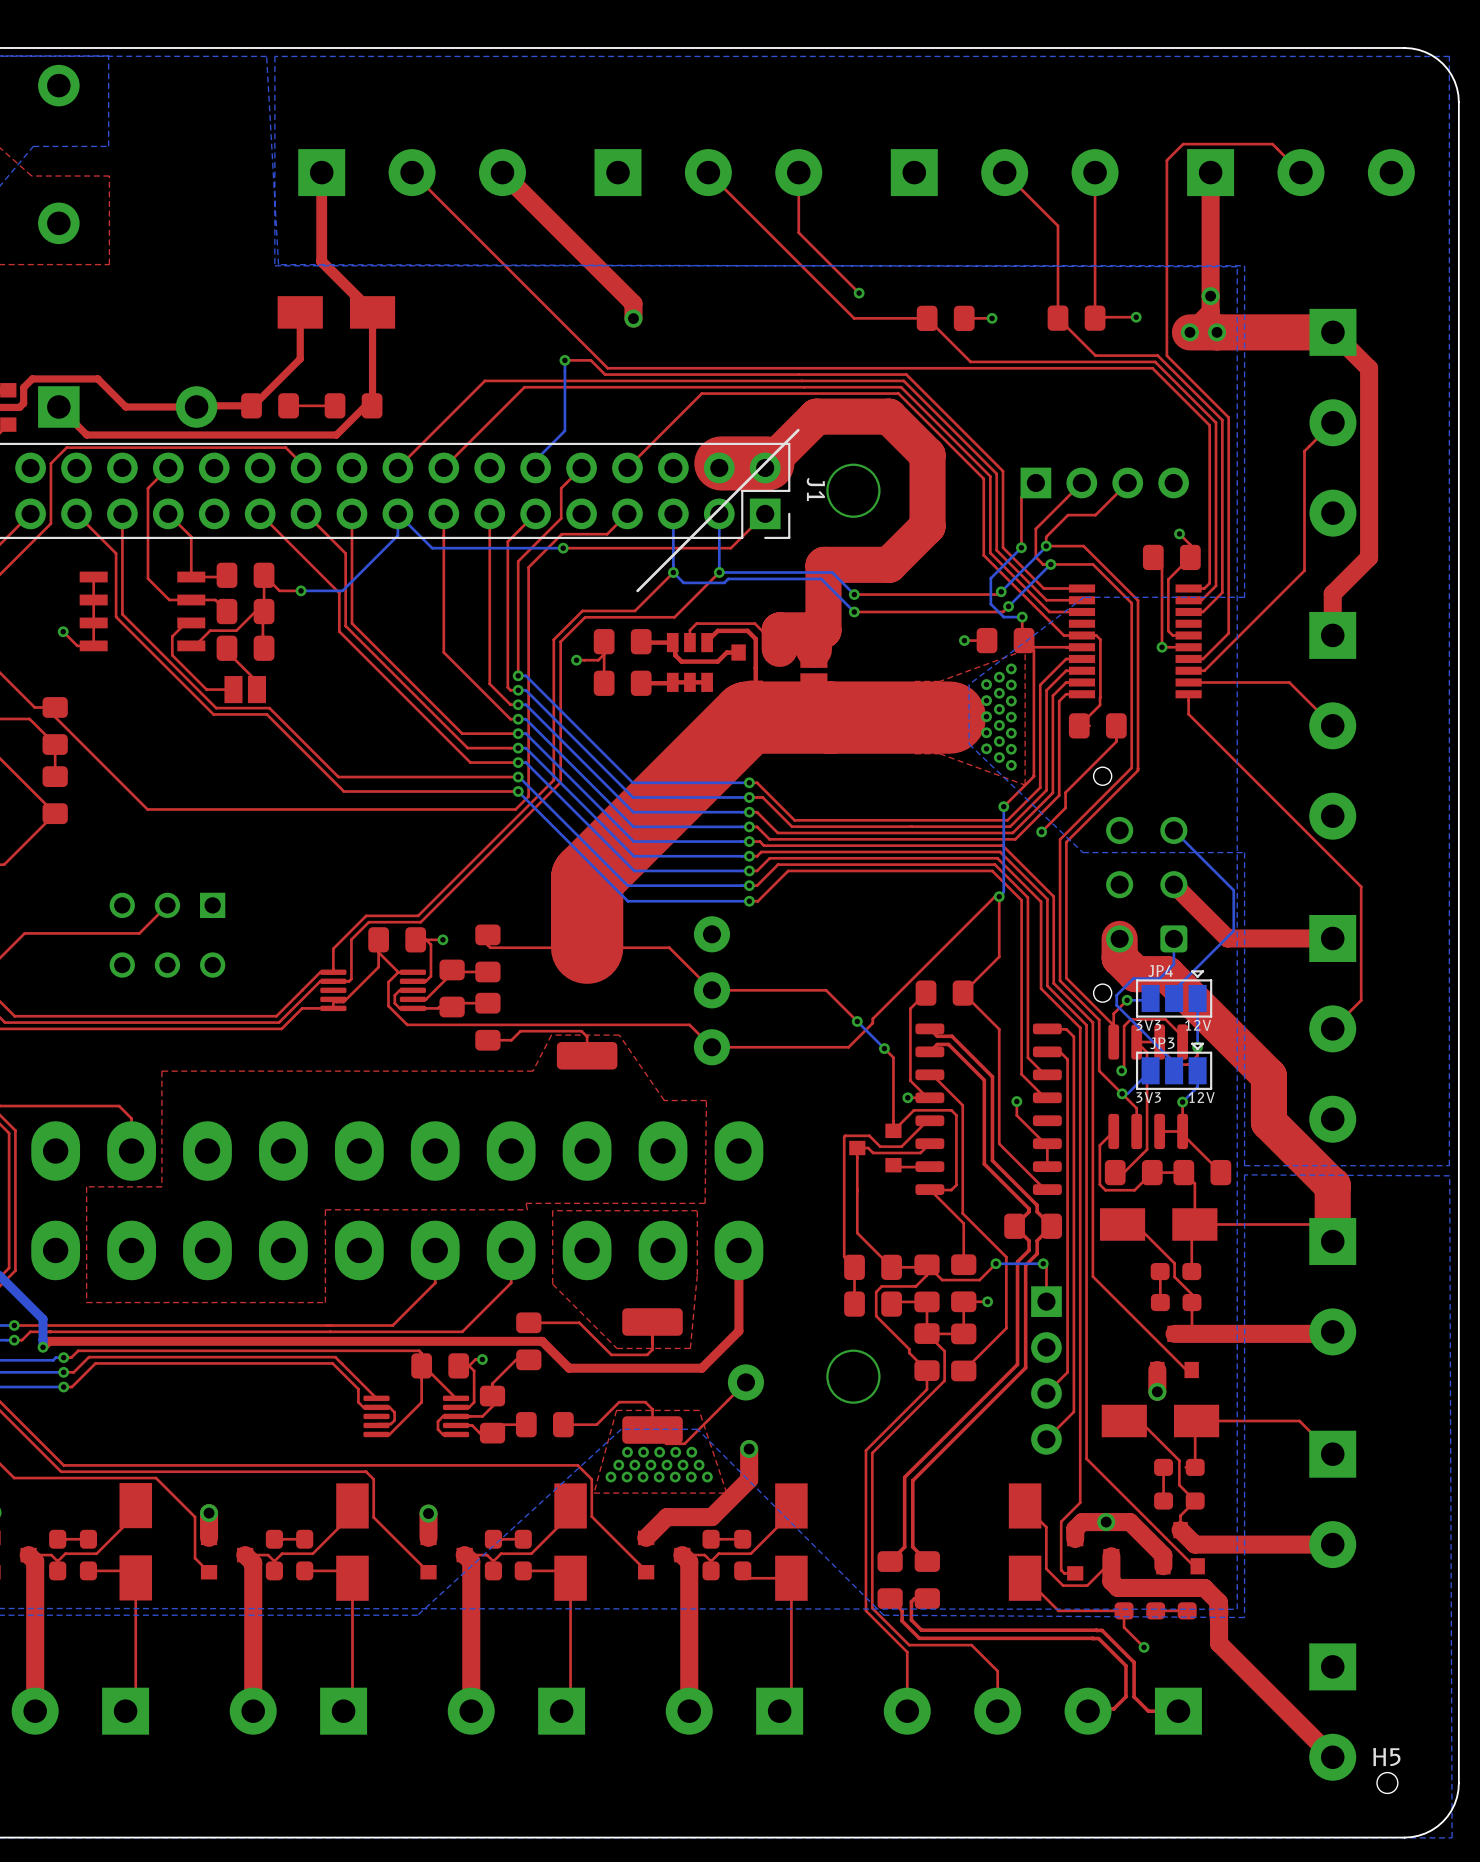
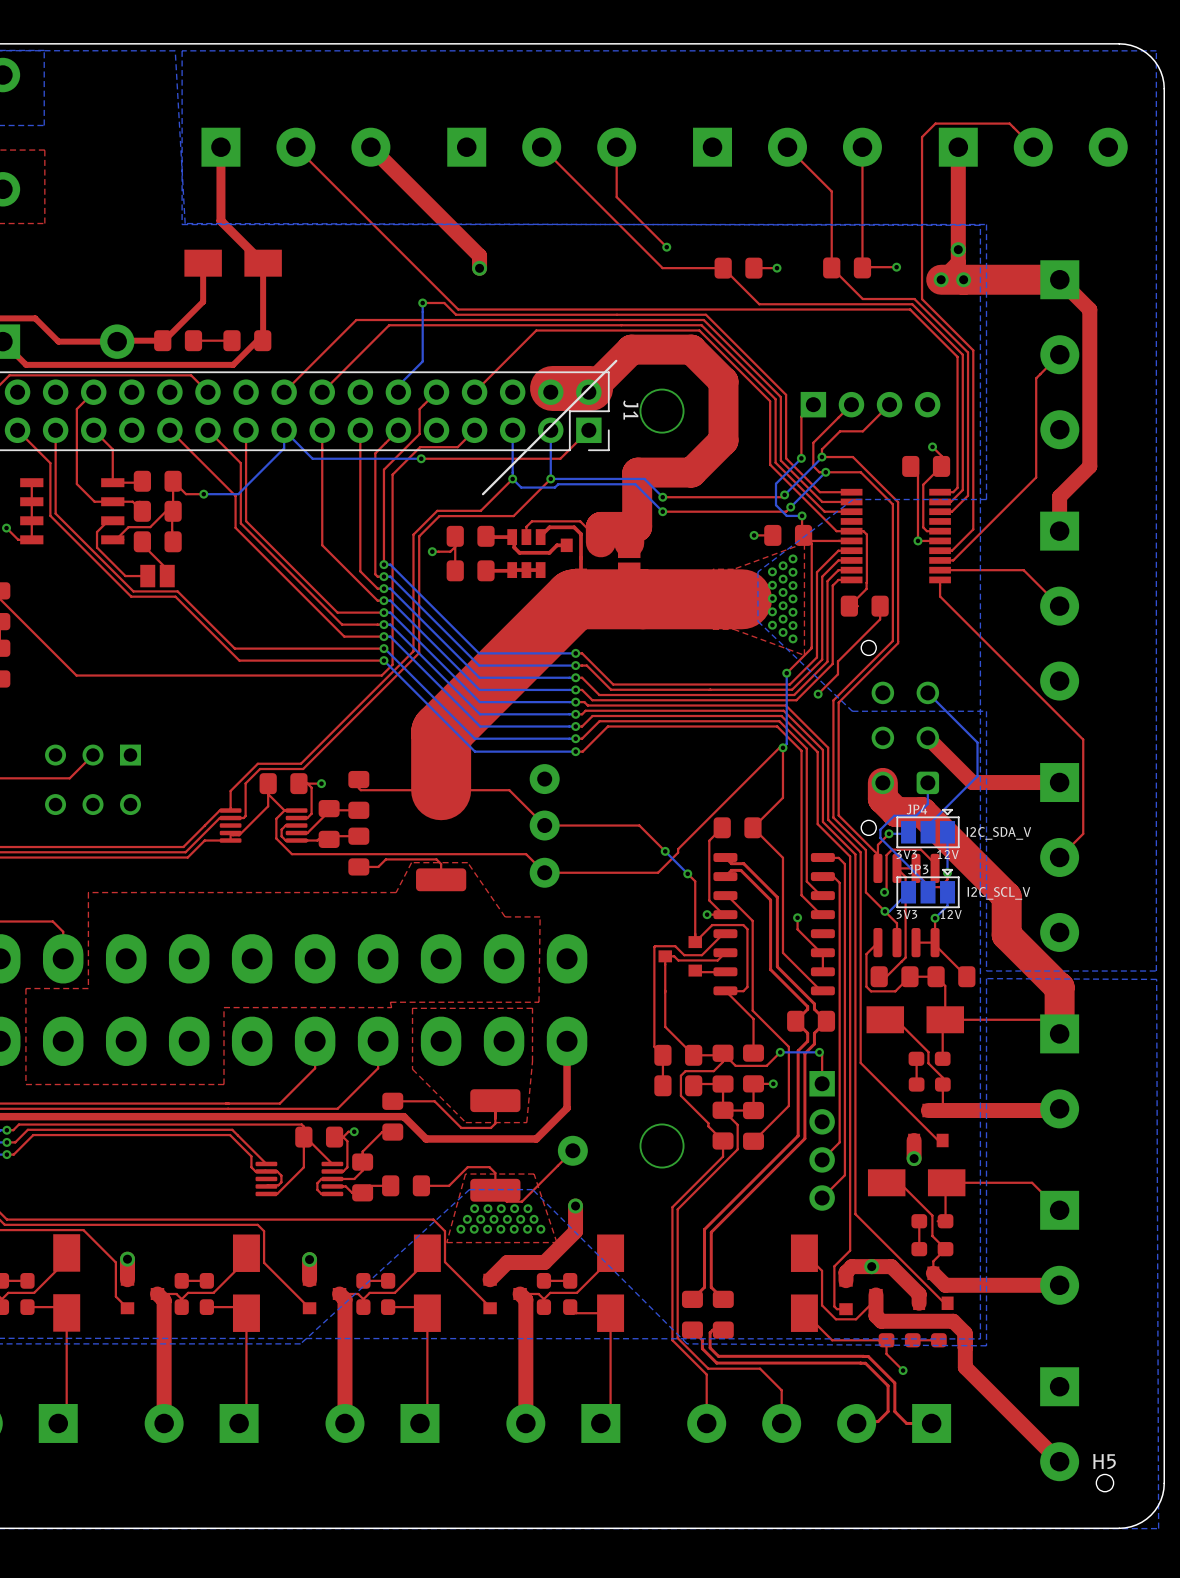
JP4 value: none -> I2C_SDA_V (998, 833)
JP3 value: none -> I2C_SCL_V (998, 893)

